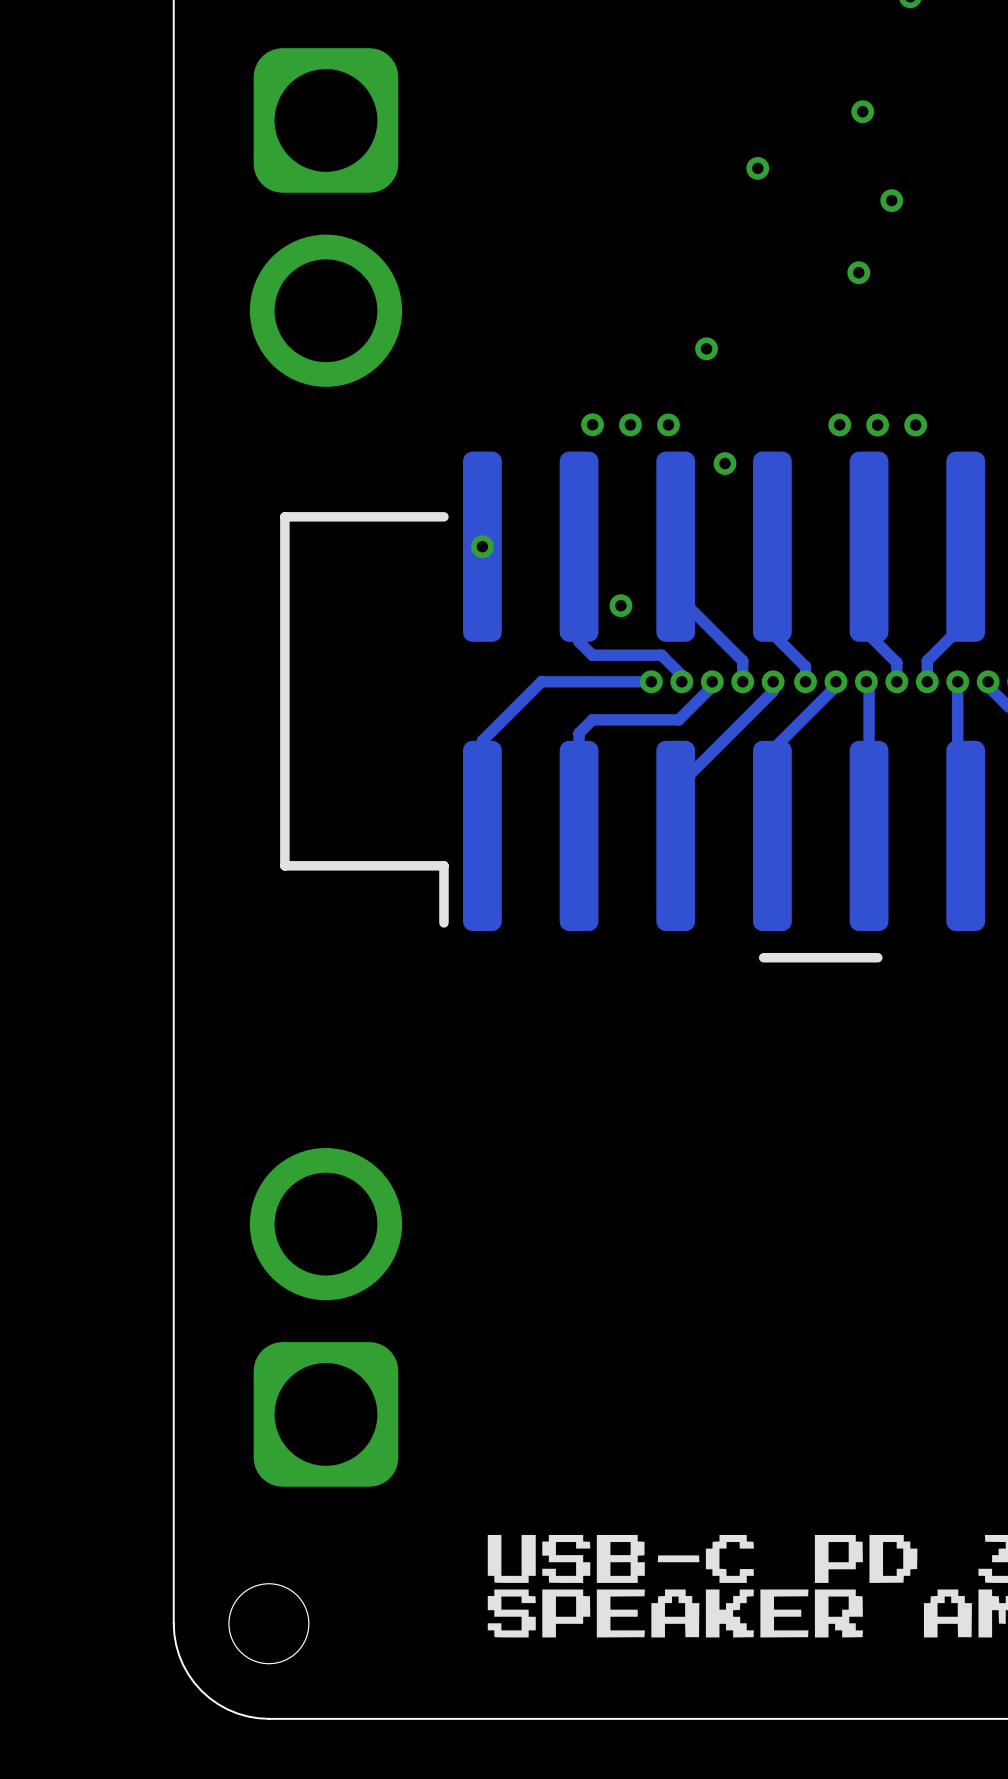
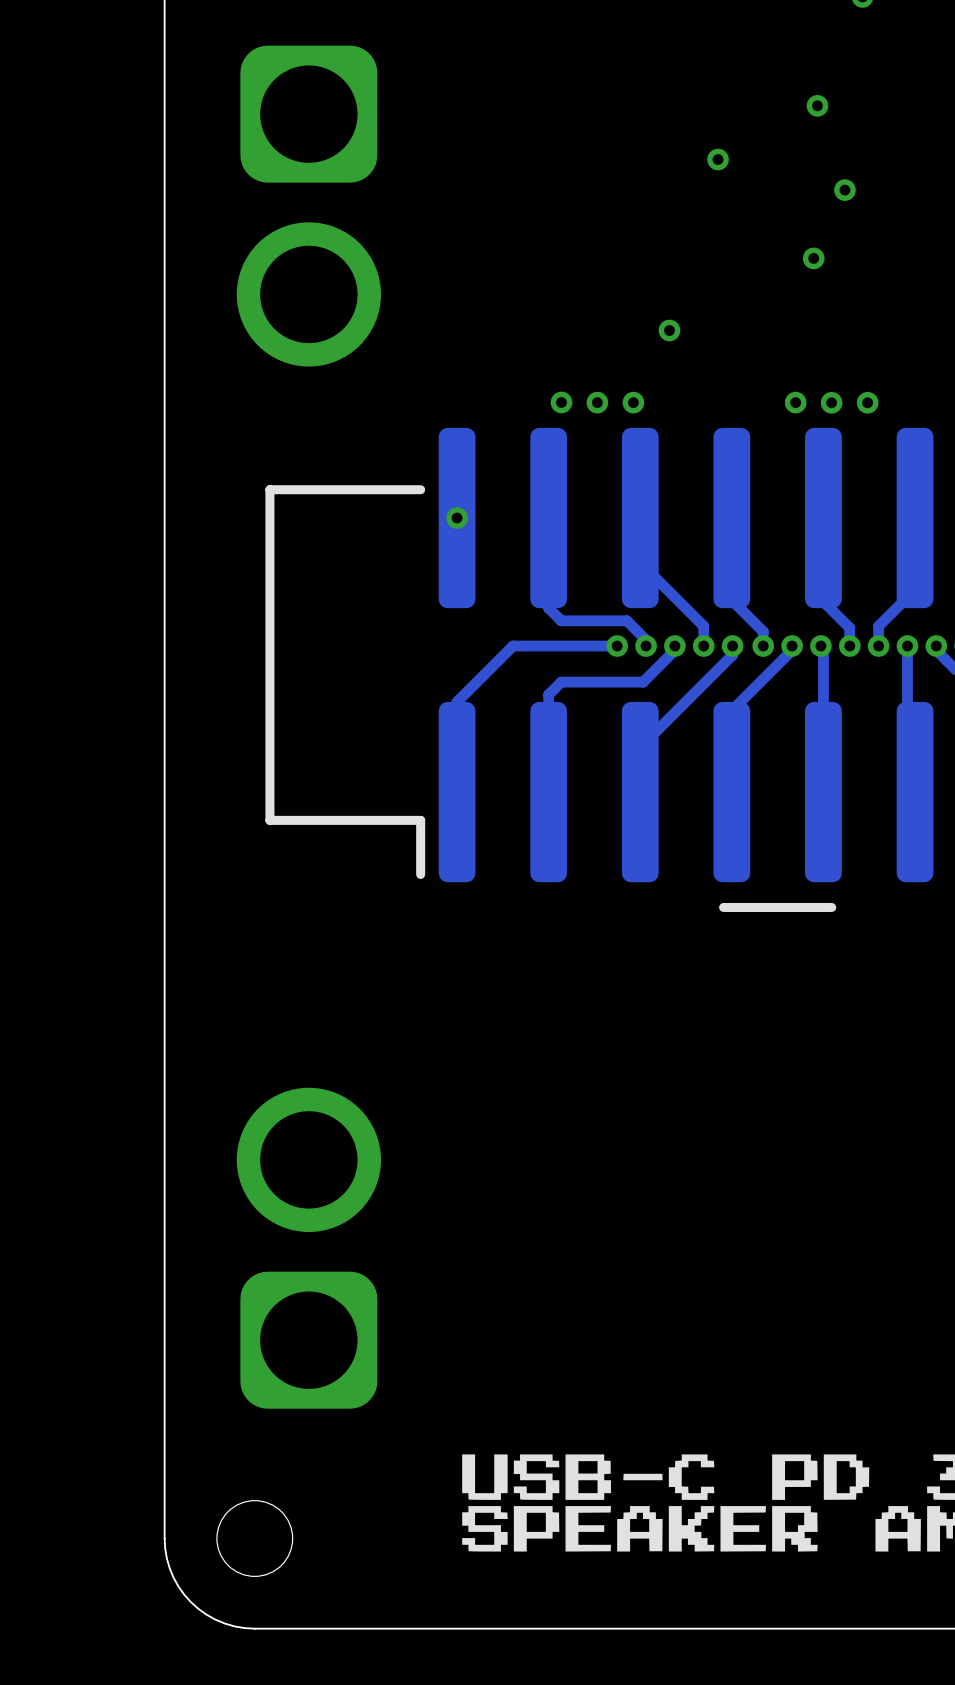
via: (725, 463) -> none
via: (620, 605) -> none

